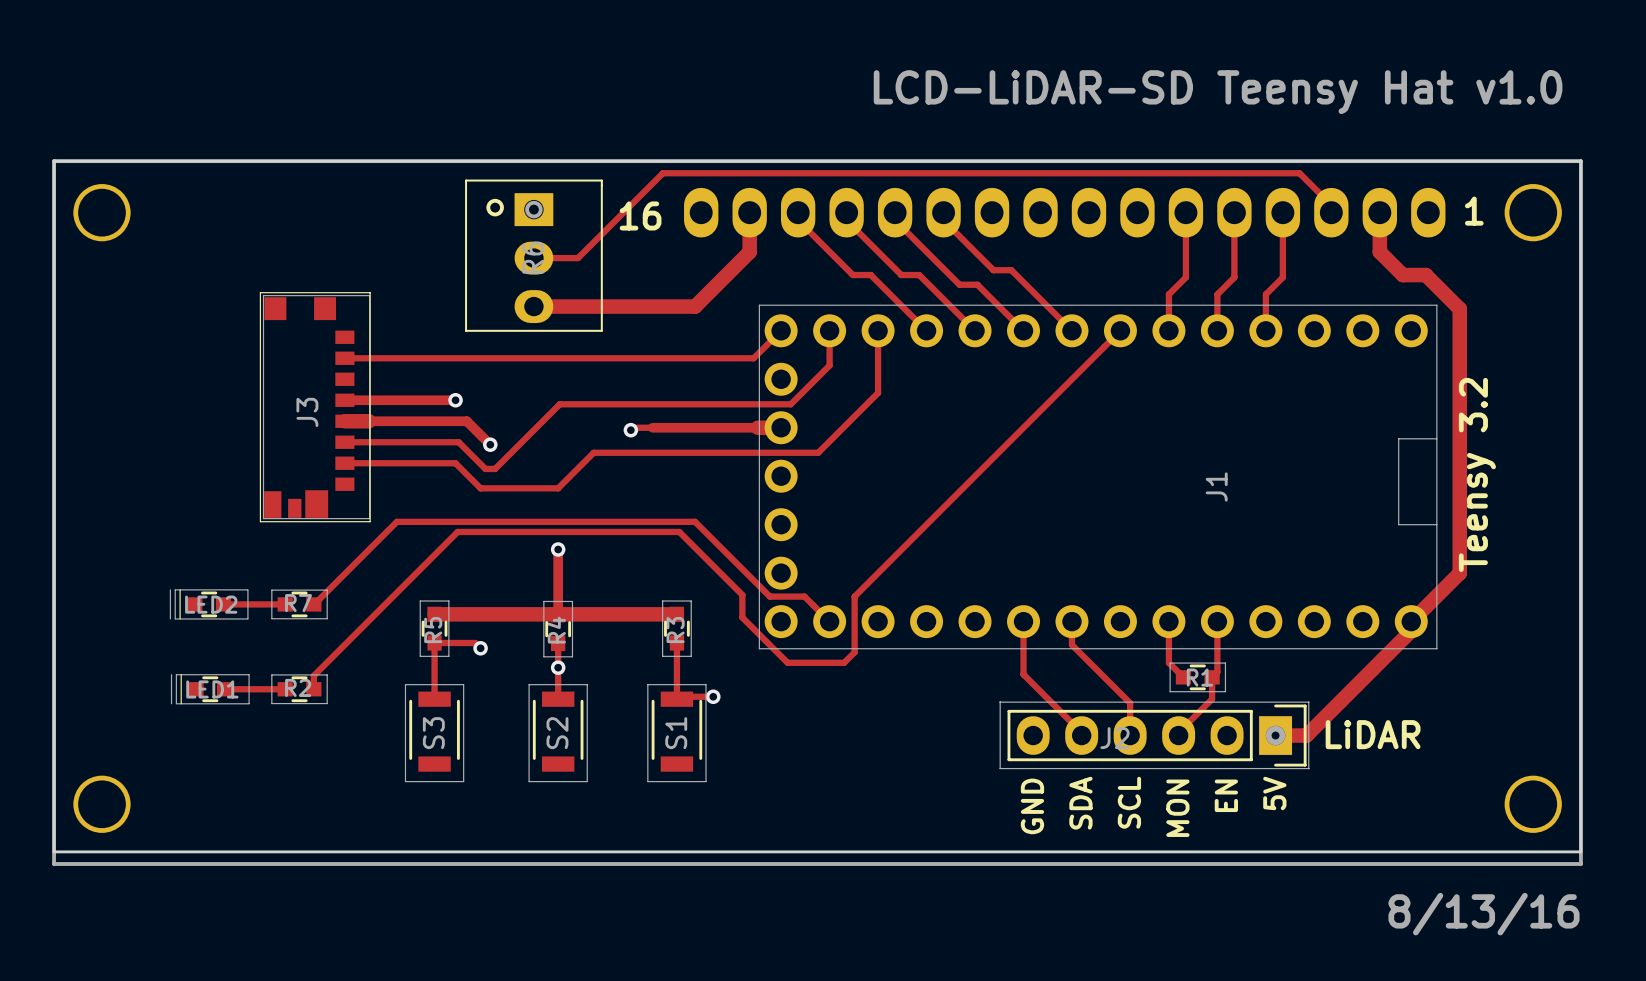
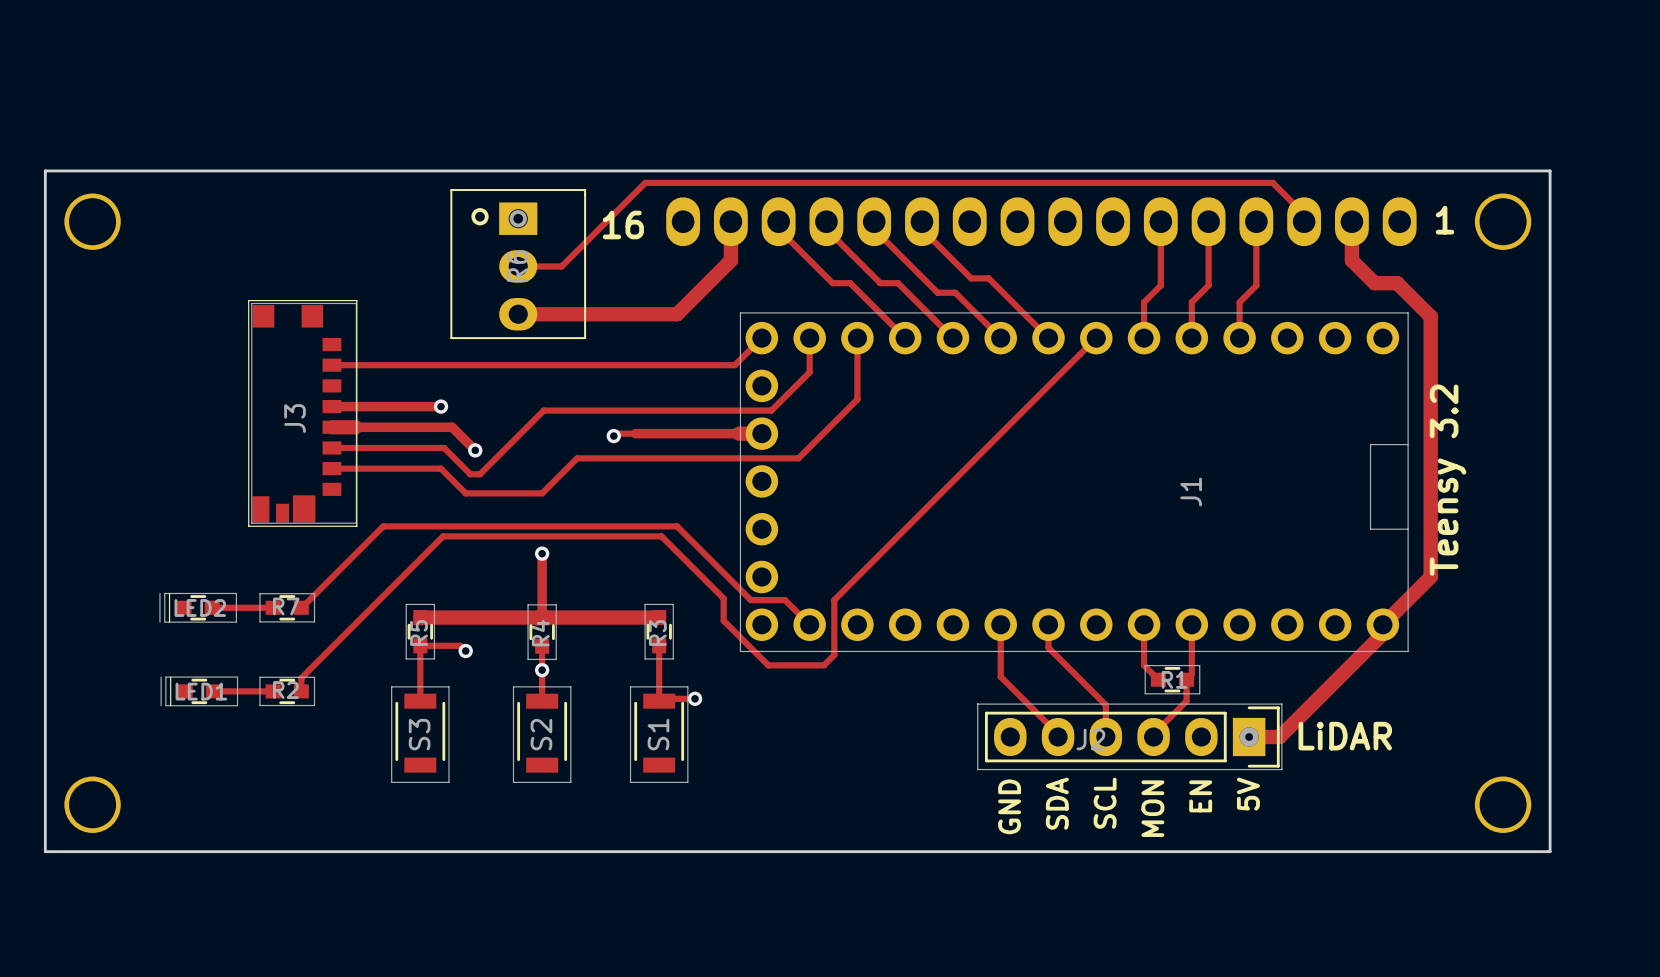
text: LCD-LiDAR-SD Teensy Hat v1.0 (1218, 92) -> none
line: (54, 161) (54, 864) (1580, 864) (1580, 161) (54, 161) -> none
text: 8/13/16 (1483, 914) -> none

